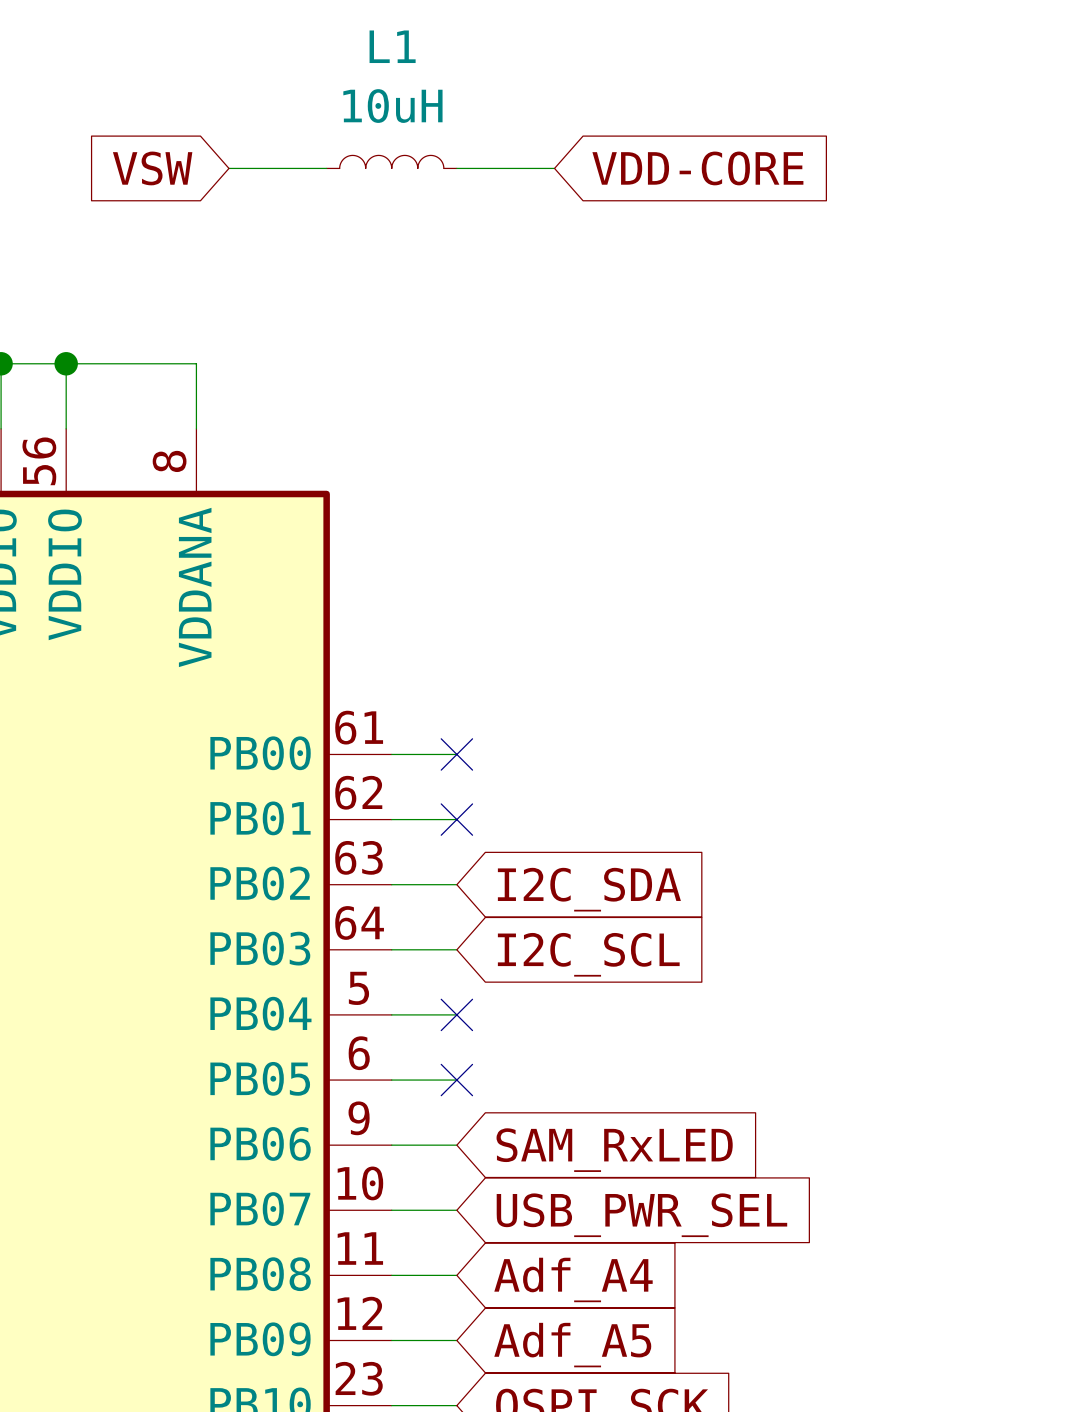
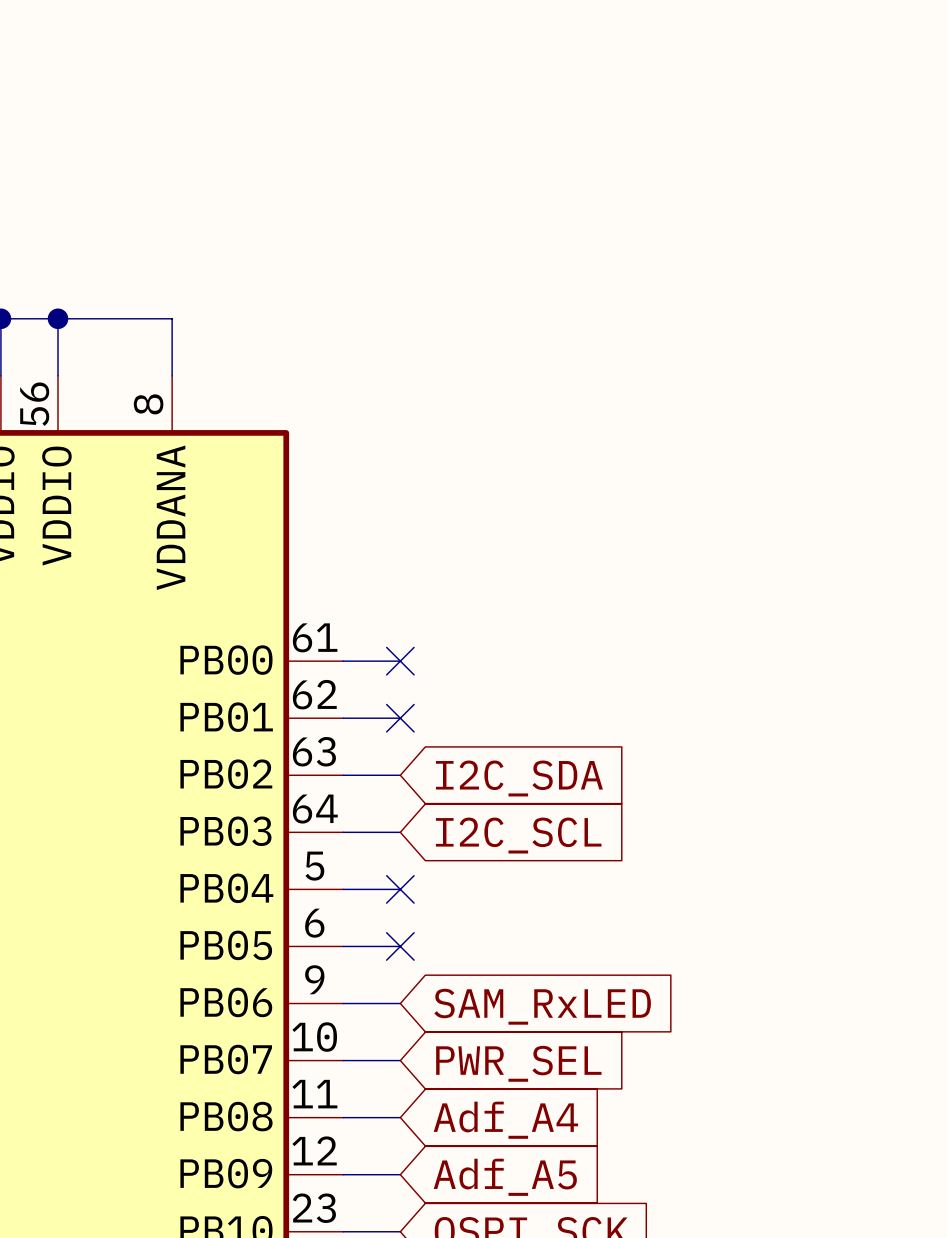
L1: 10uH (391, 161) -> none
global label: VSW (152, 168) -> none
wire: (228, 168) (326, 168) -> none
wire: (456, 168) (554, 168) -> none
global label: VDD-CORE (697, 168) -> none
global label: USB_PWR_SEL (641, 1215) -> PWR_SEL (518, 1063)

